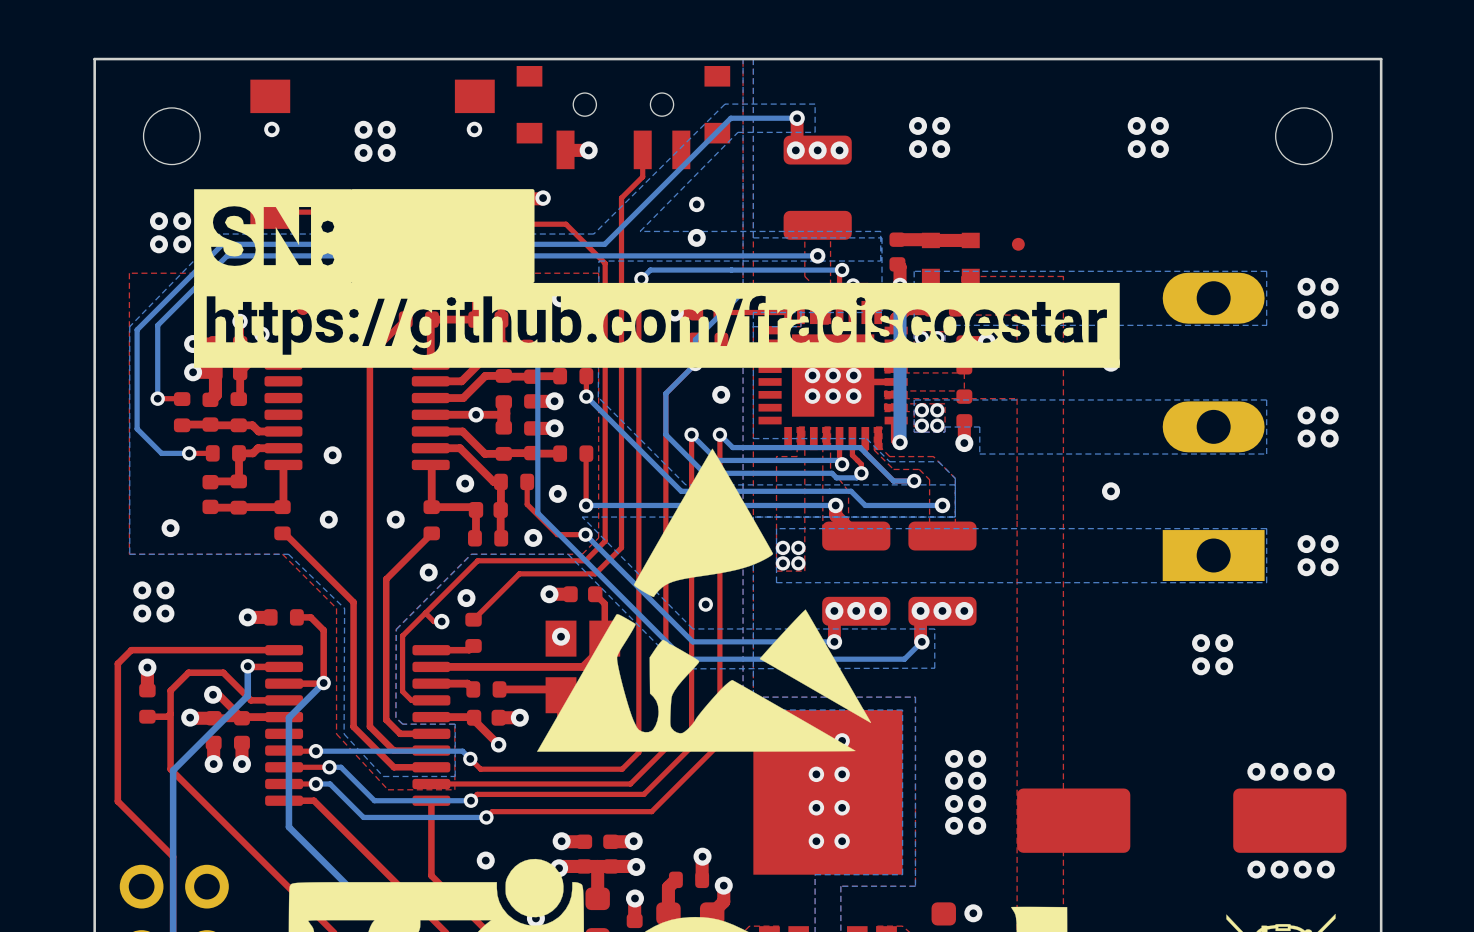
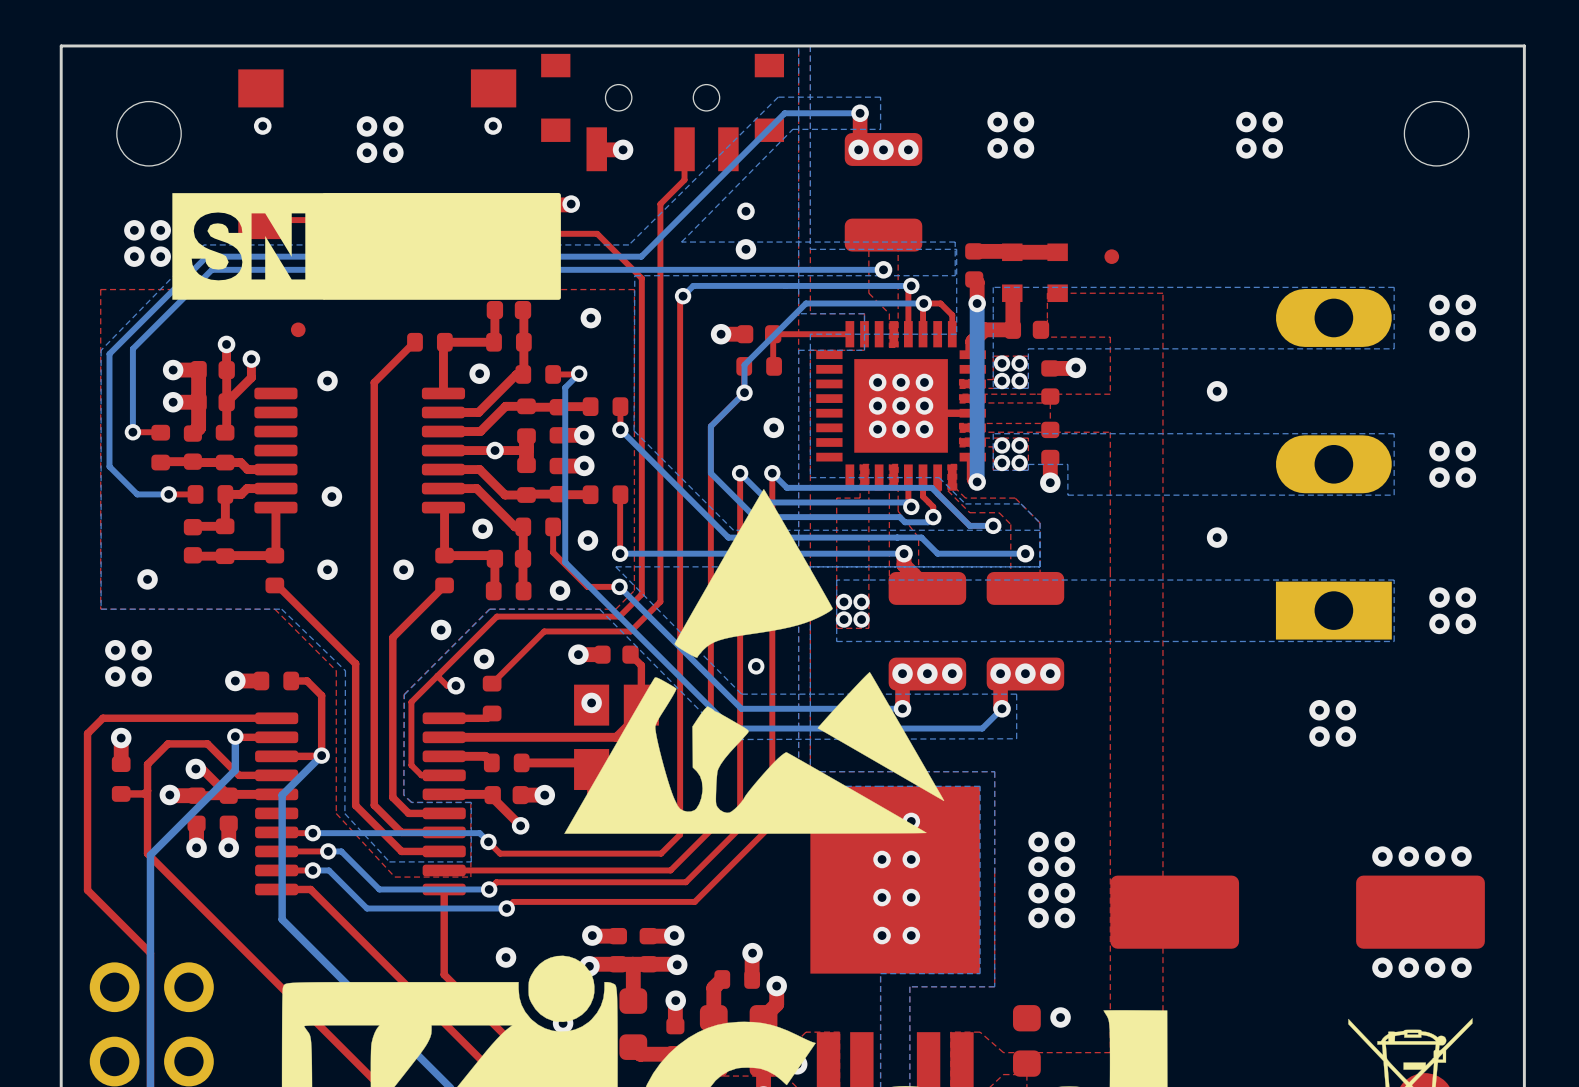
drawing shape: [194, 189, 352, 283] -> [172, 193, 325, 300]
drawing shape: [350, 189, 535, 284] -> [322, 193, 561, 300]
drawing: [194, 282, 1120, 368] -> none

